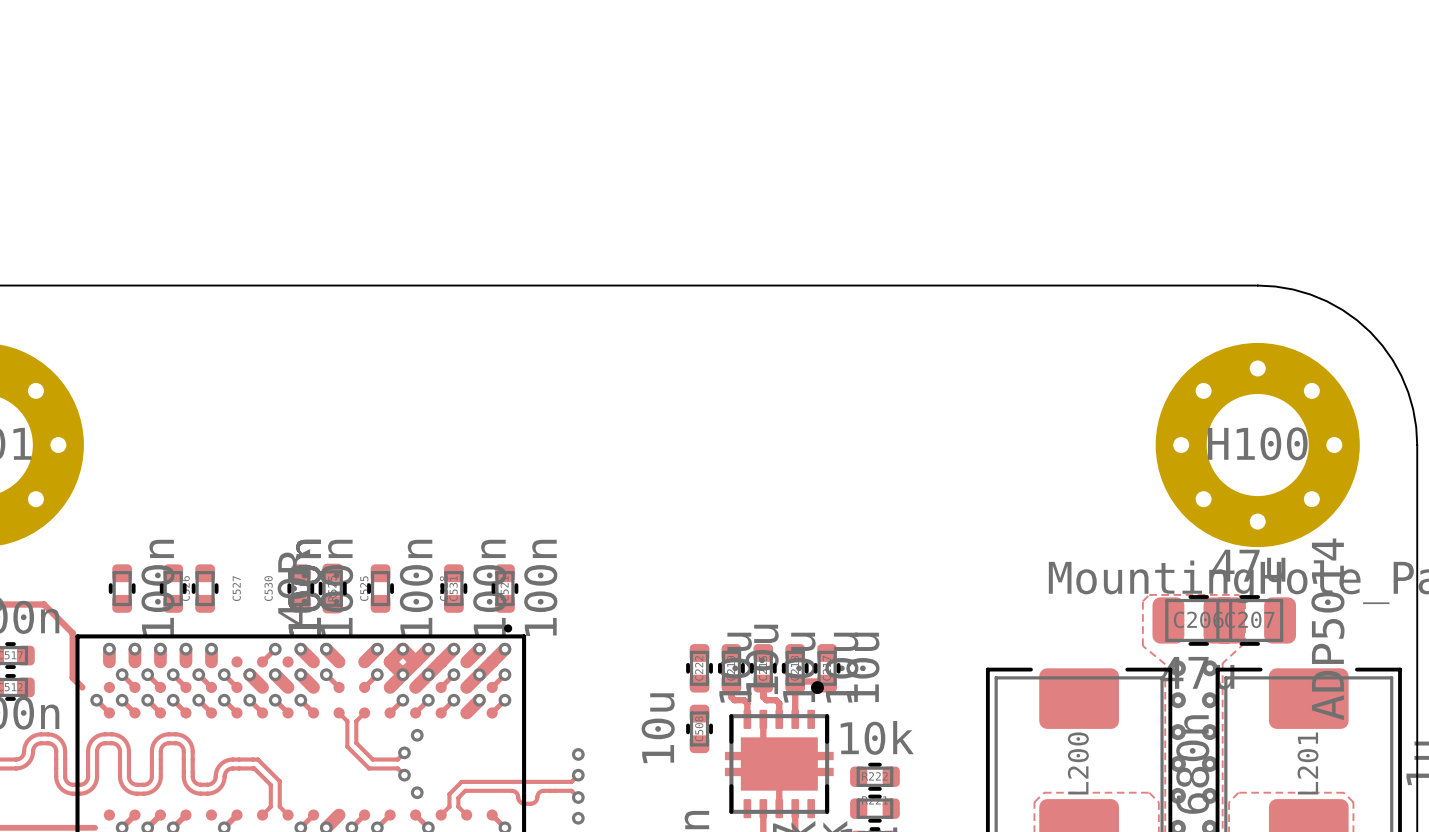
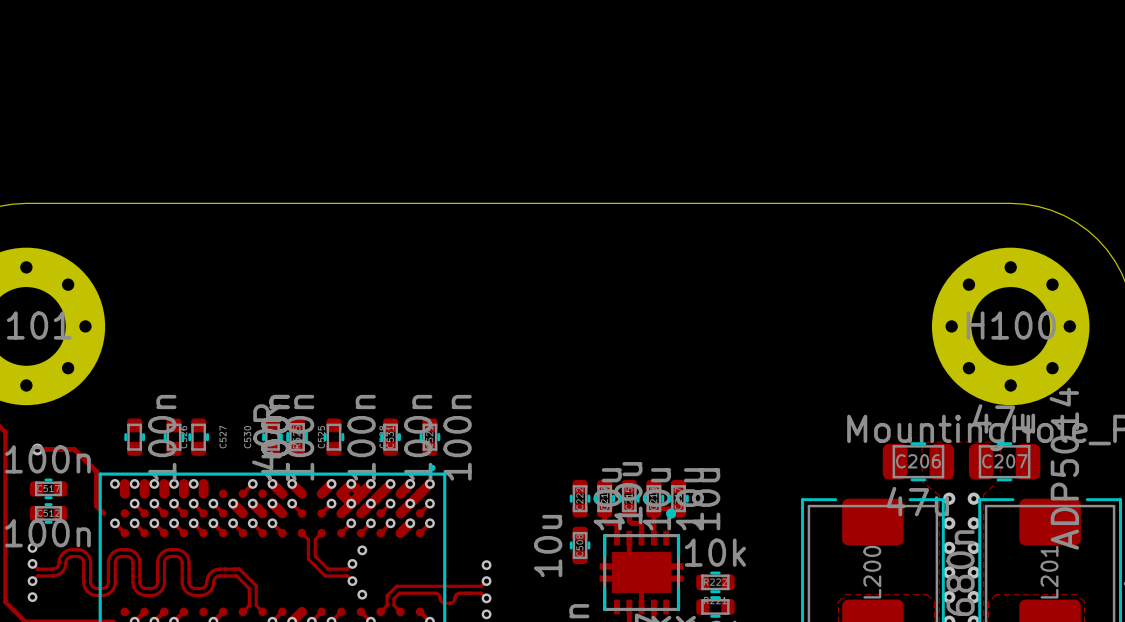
C206 position: (1198, 620) -> (918, 461)
via: none -> (114, 483)
via: (109, 649) -> none
via: none -> (134, 483)
via: (134, 649) -> none
via: none -> (154, 483)
via: (160, 649) -> none
via: none -> (174, 483)
via: (185, 649) -> none
via: none -> (193, 483)
via: (211, 649) -> none

